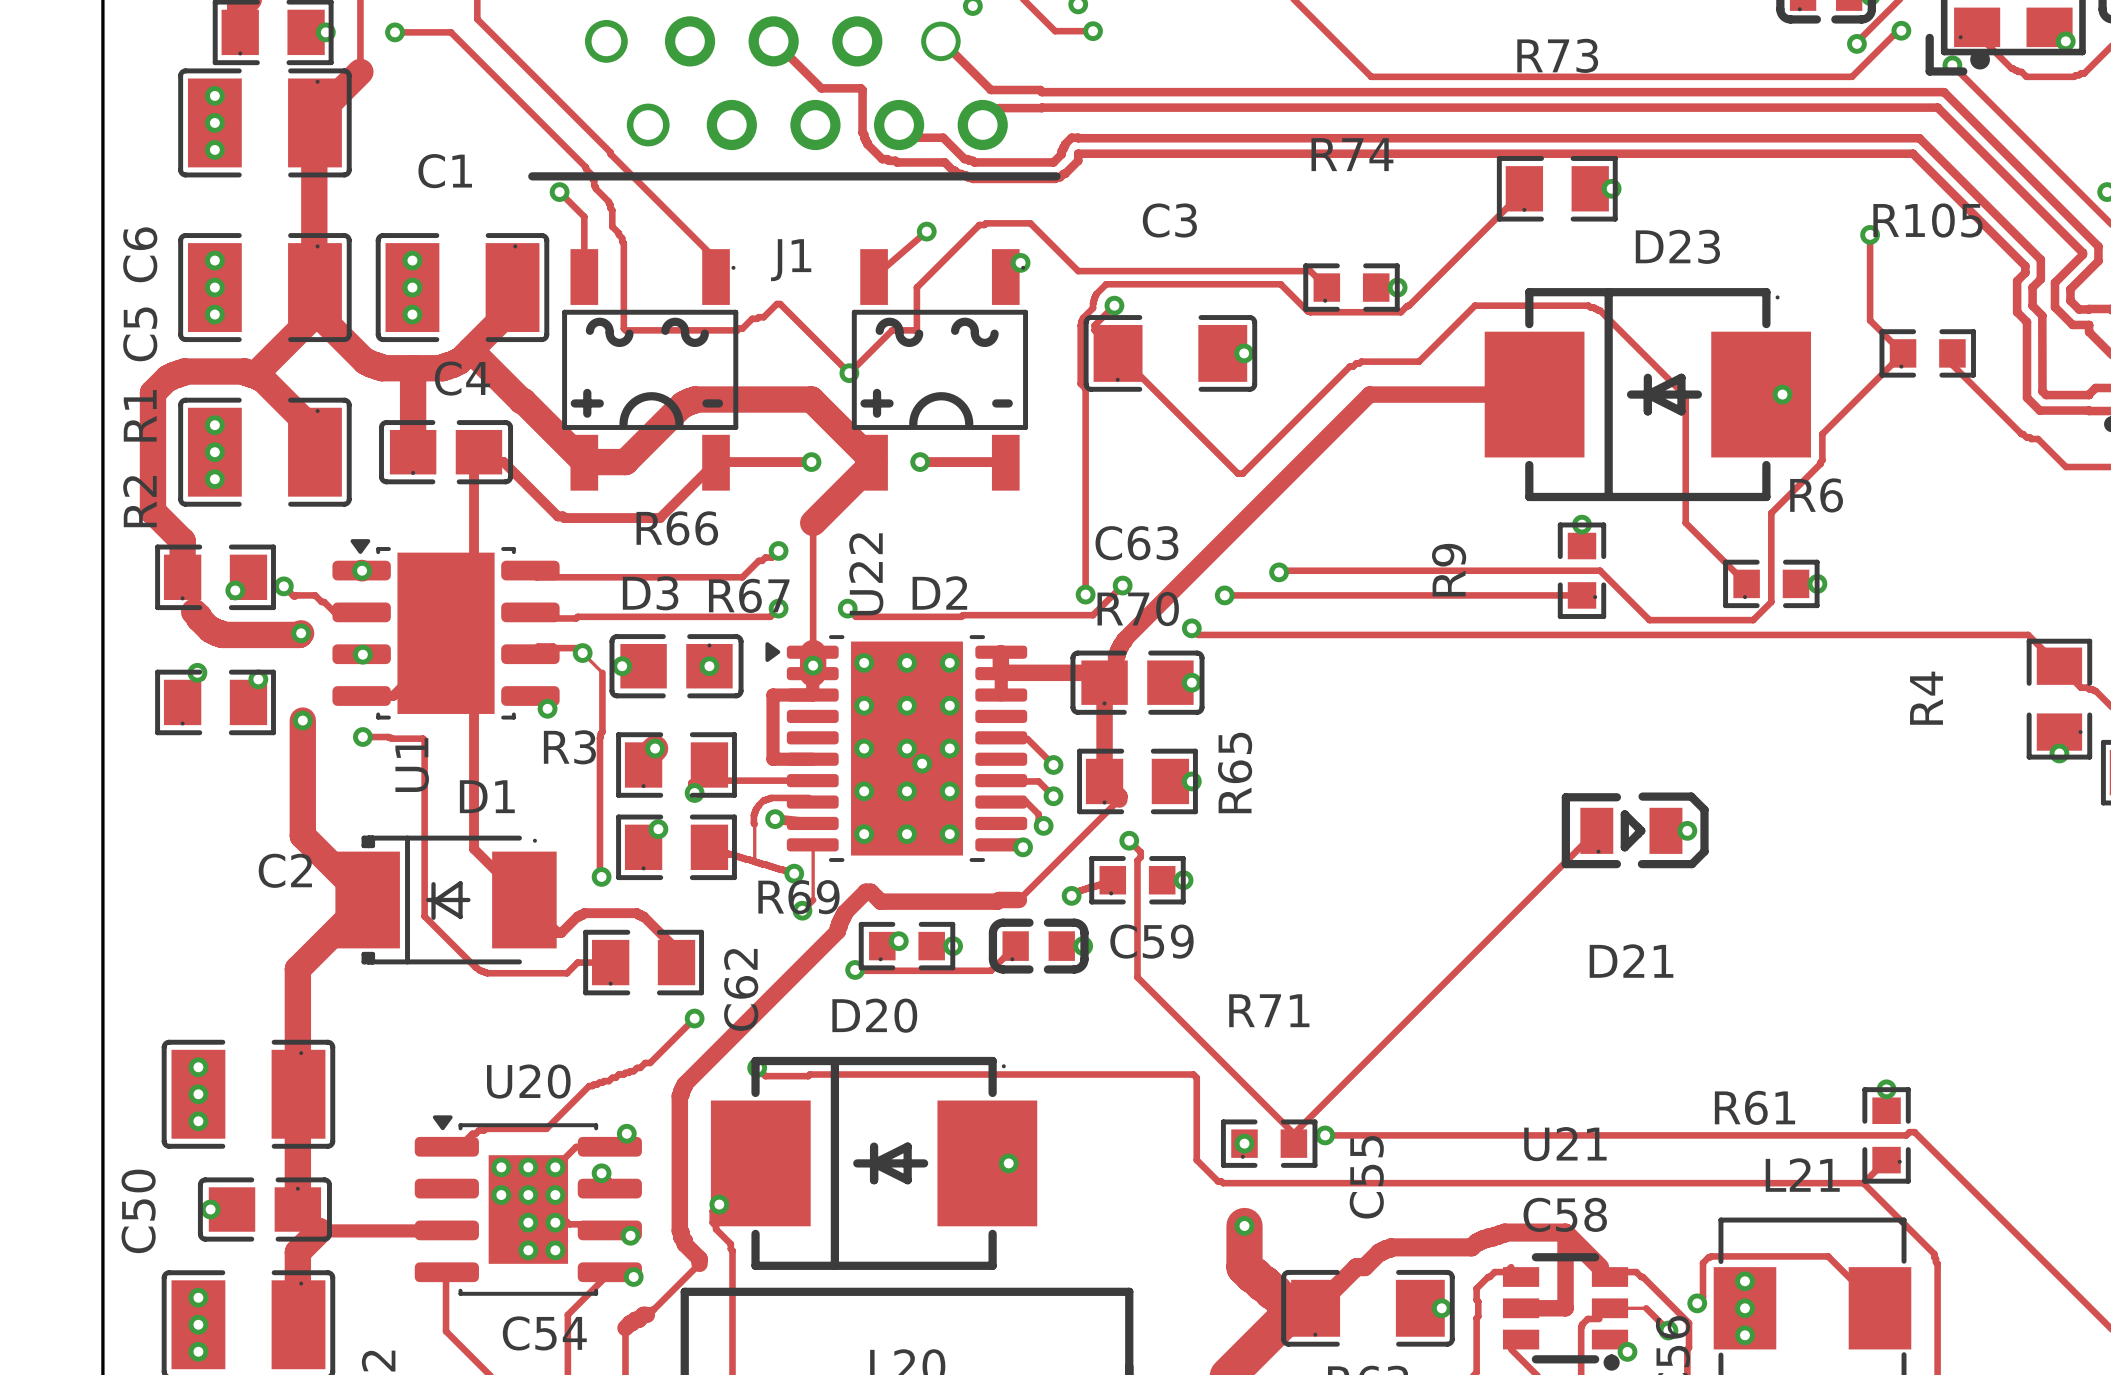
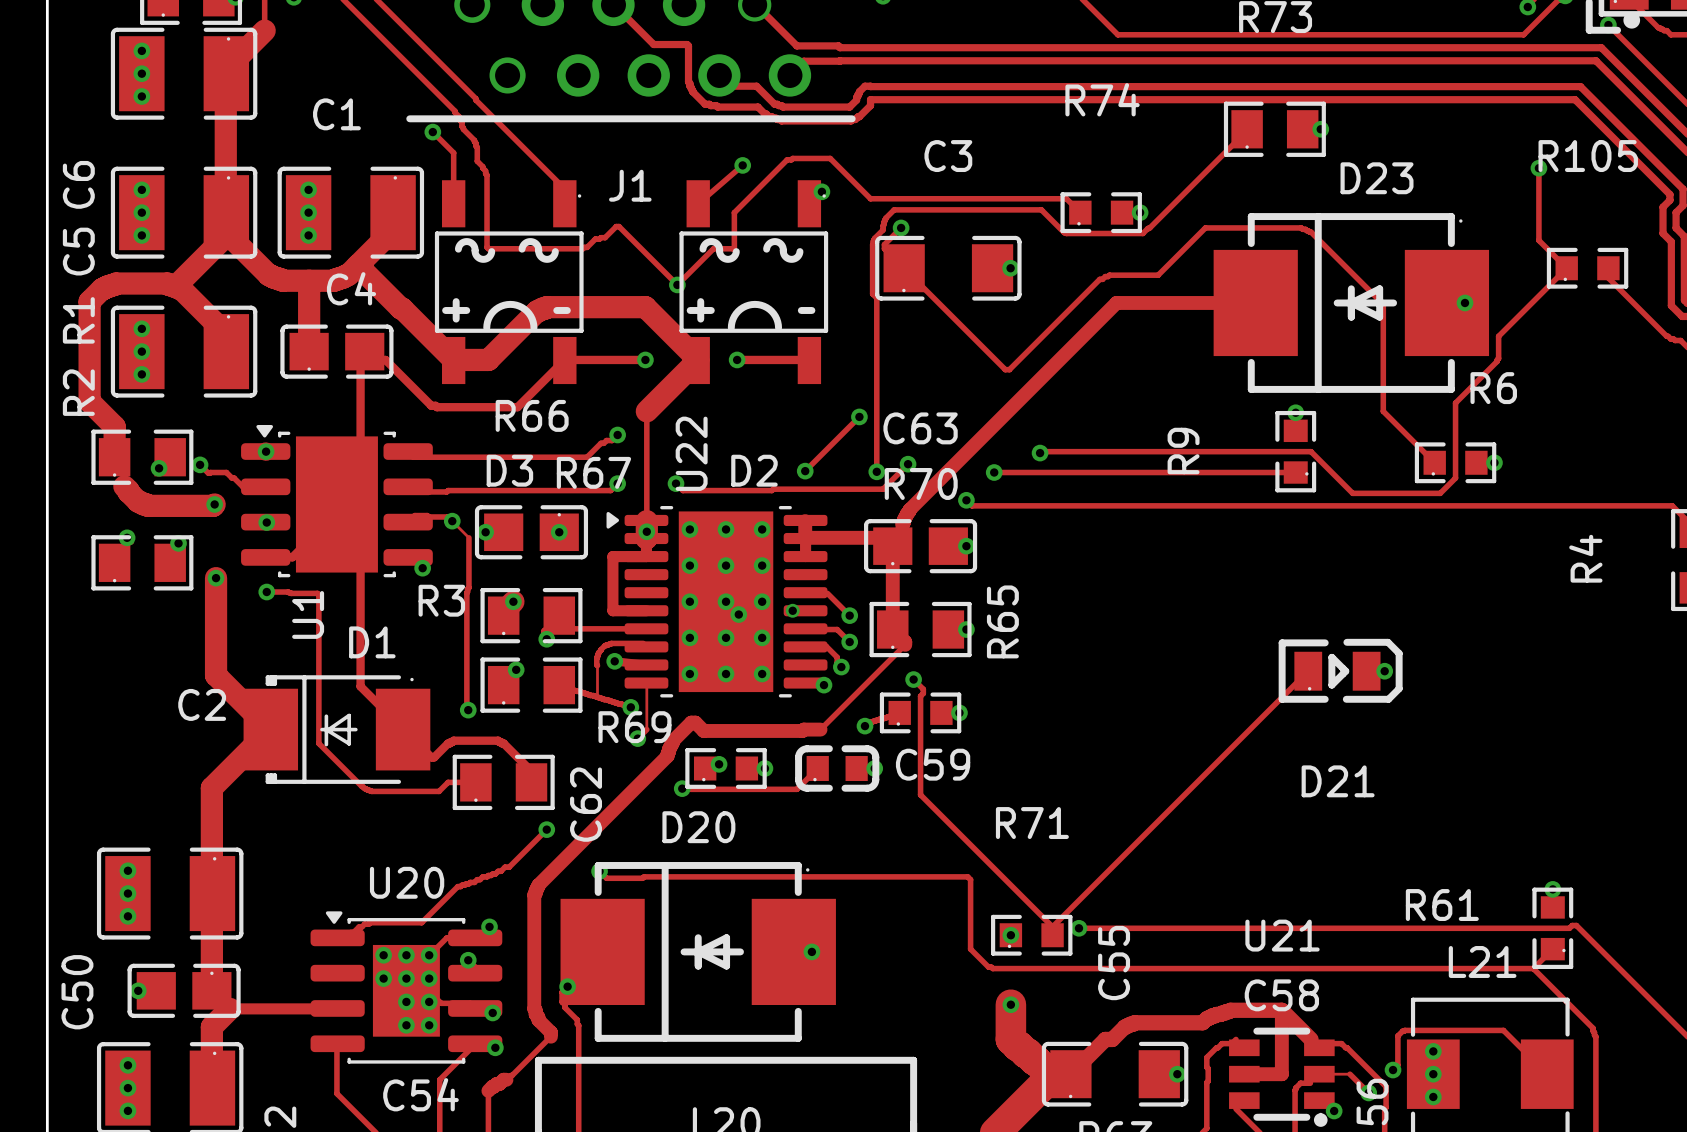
track: none -> (859, 416) (805, 471)
via: none -> (859, 416)
via: none -> (805, 471)
via: none -> (792, 610)

